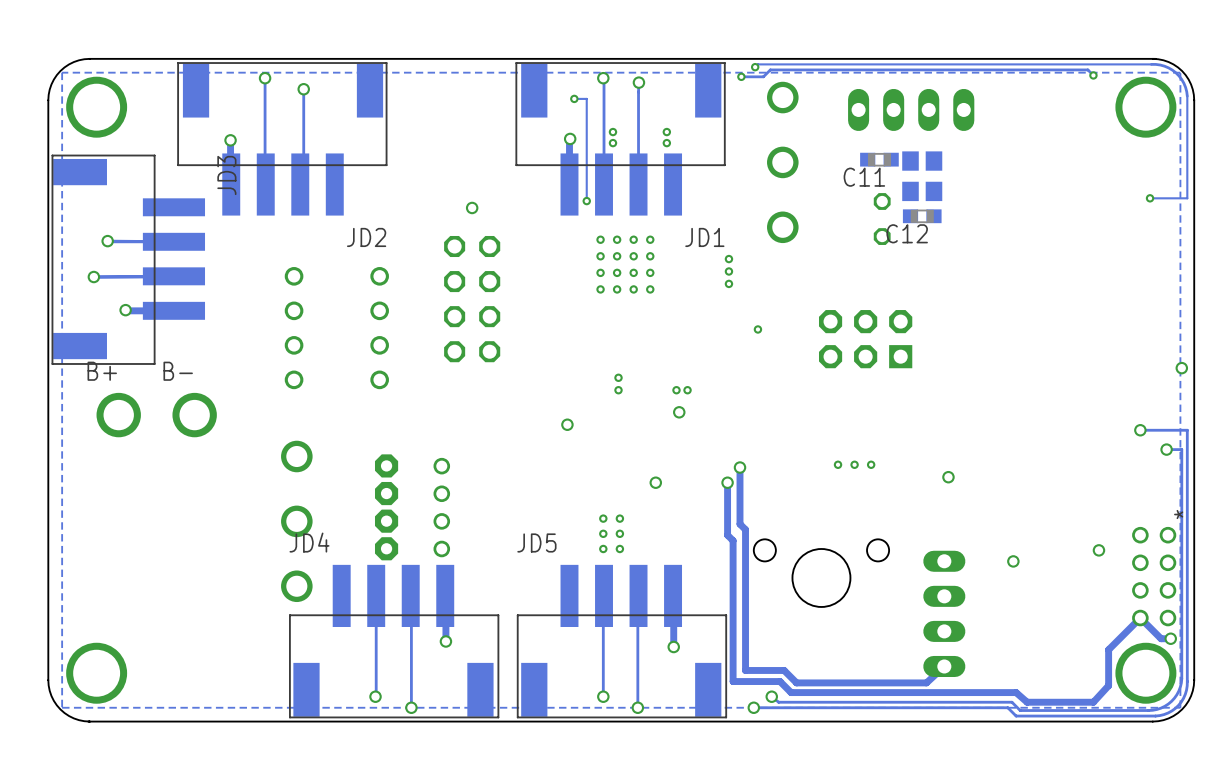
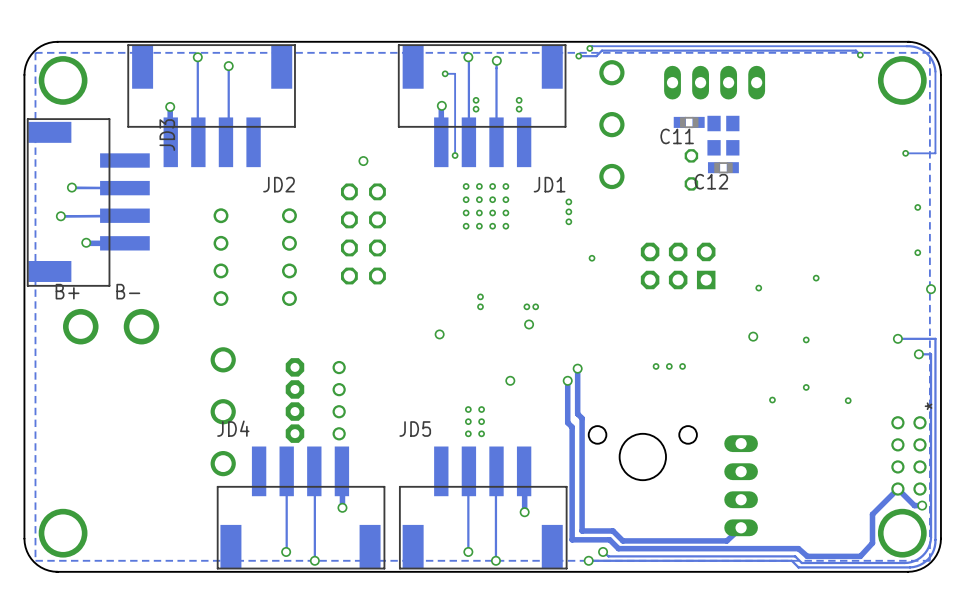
via: none -> (917, 207)
via: none -> (917, 252)
via: none -> (816, 278)
via: none -> (758, 288)
via: none -> (806, 339)
via position: (948, 477) -> (753, 336)
via: none -> (806, 387)
via: none -> (772, 400)
via: none -> (848, 400)
via: (1098, 550) -> none
via: (1013, 561) -> none

